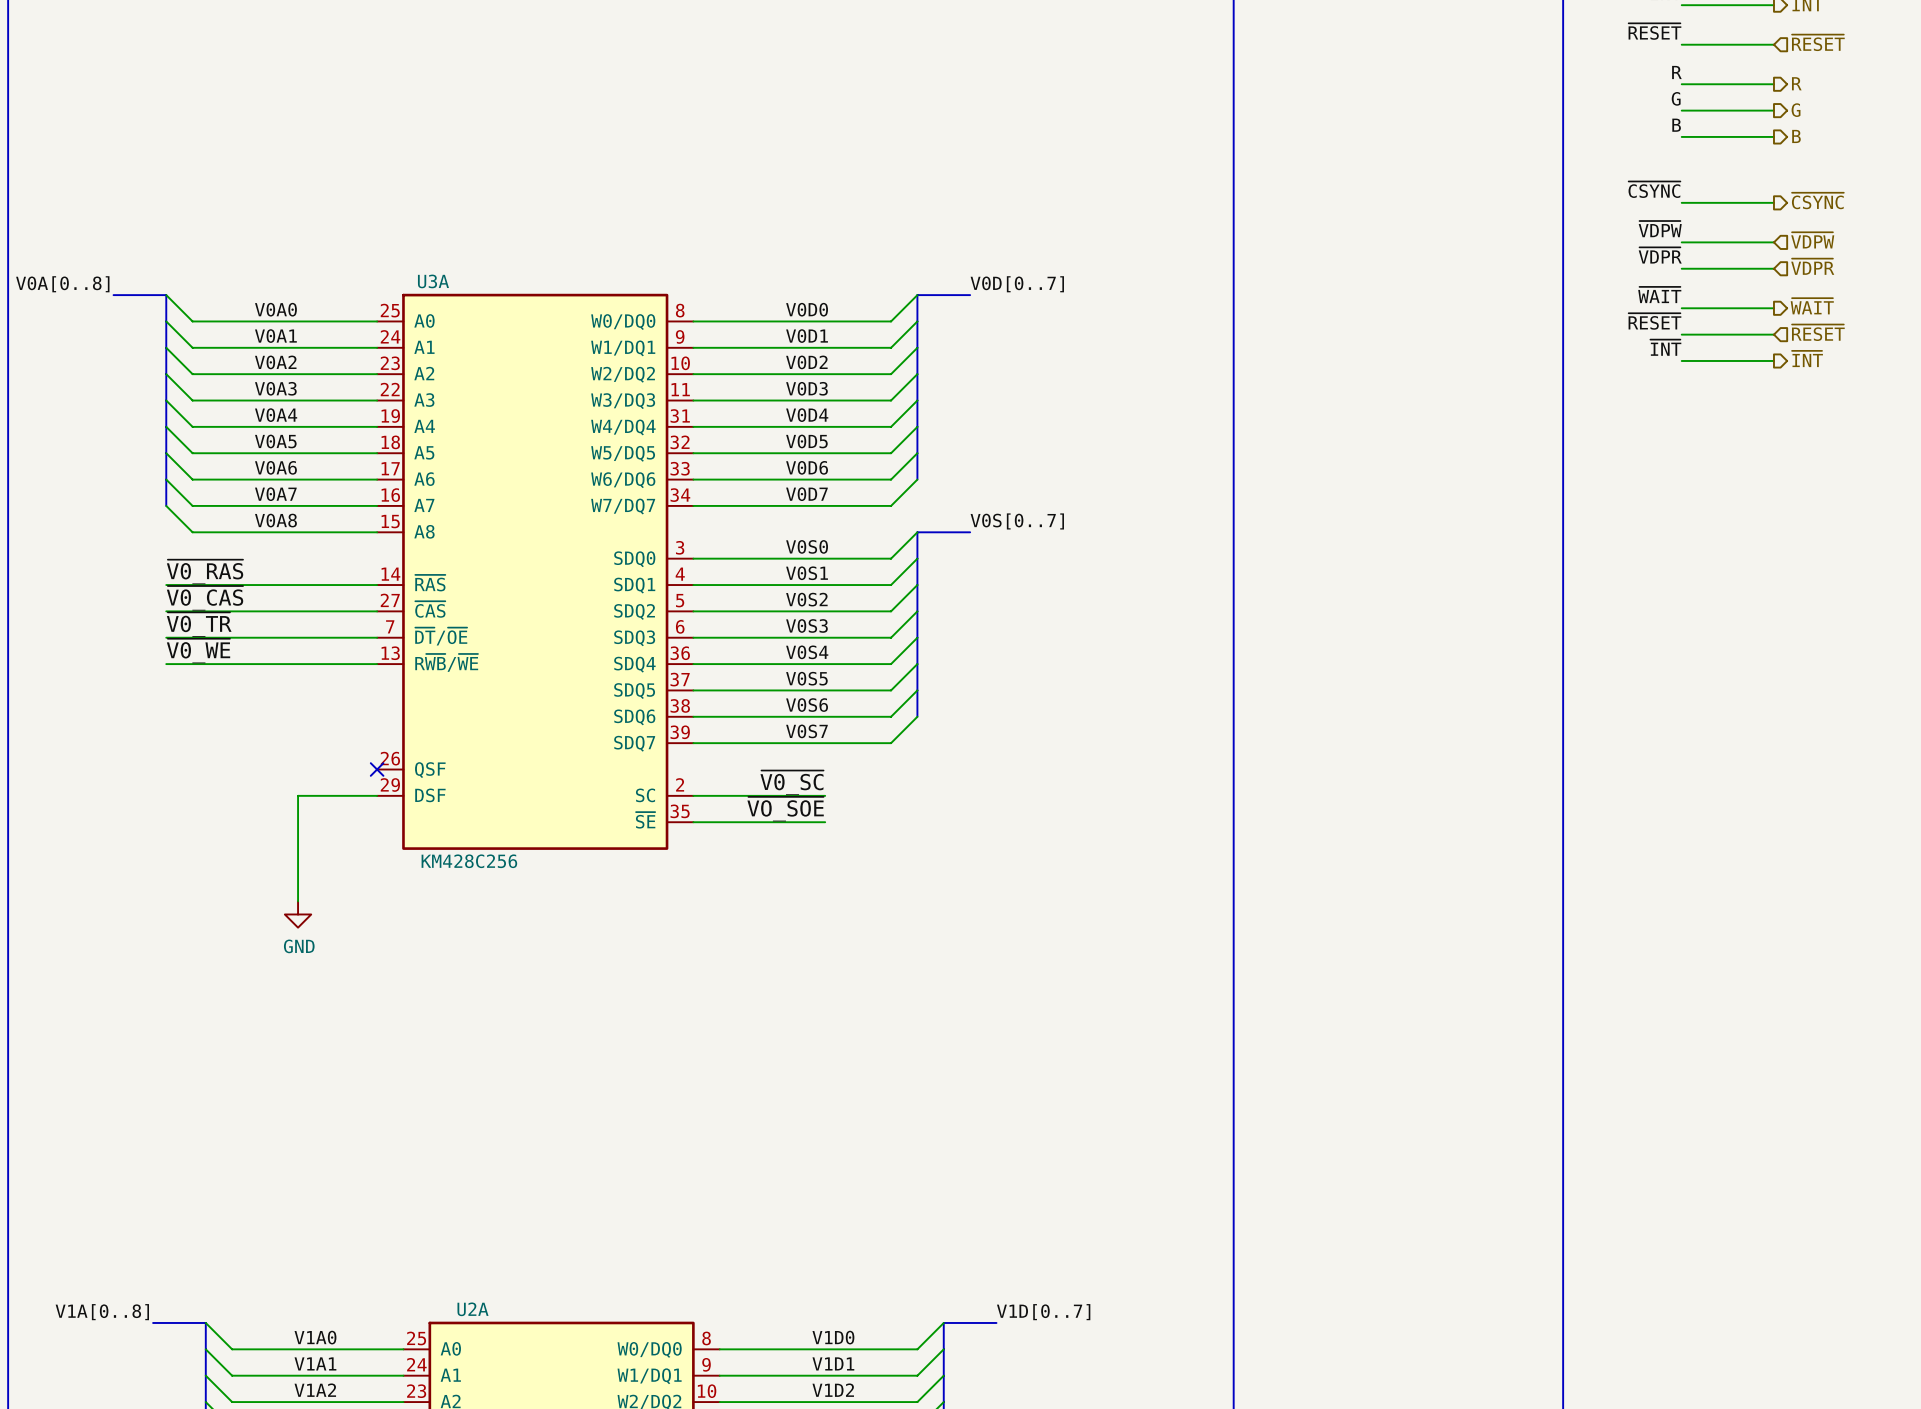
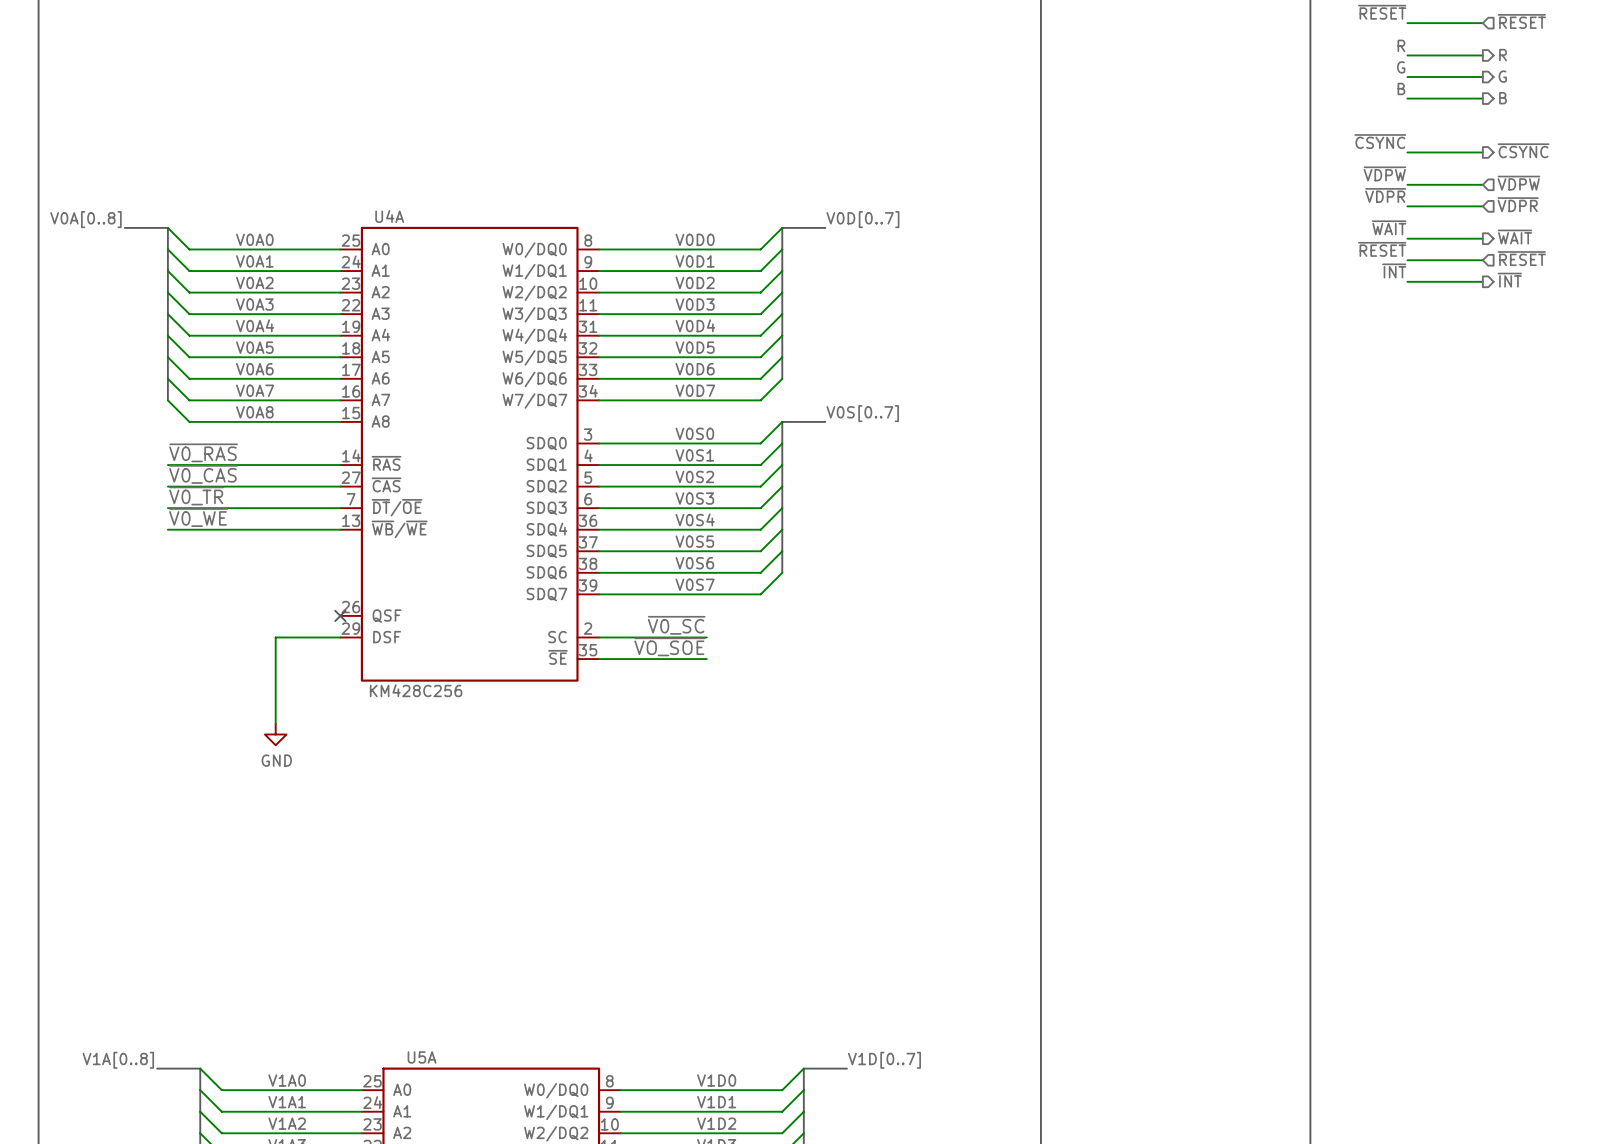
U3A name: U3A (433, 281) -> U4A (389, 216)
U3A pin name: R~{WB}/~{WE} (446, 662) -> ~{WB}/~{WE} (399, 529)
U2A name: U2A (472, 1309) -> U5A (422, 1057)

